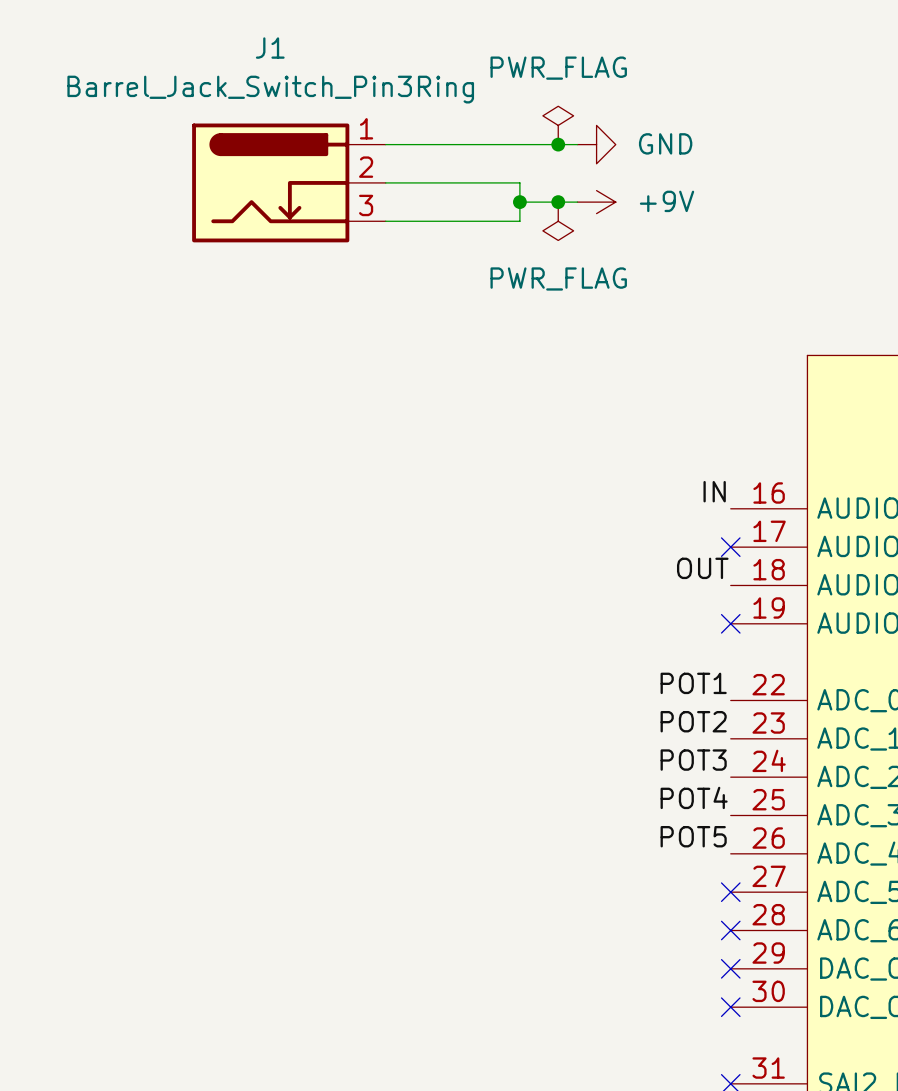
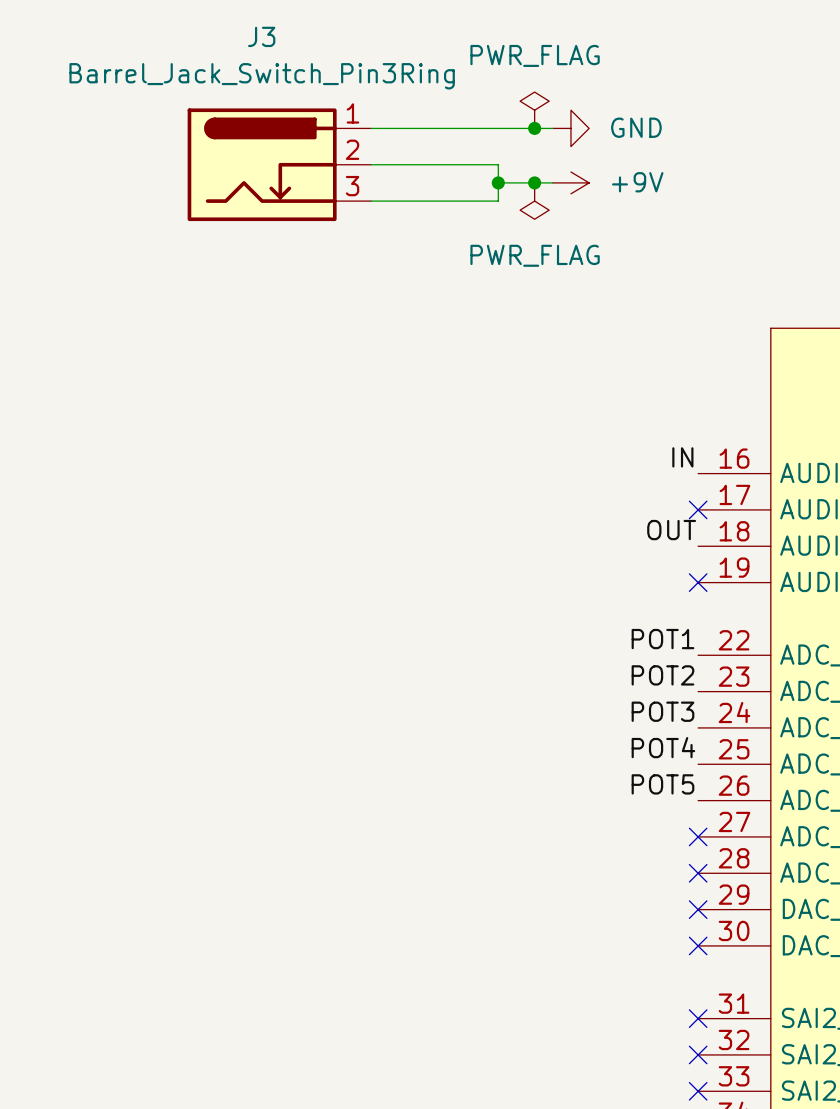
J1 name: J1 (270, 48) -> J3 (261, 36)

